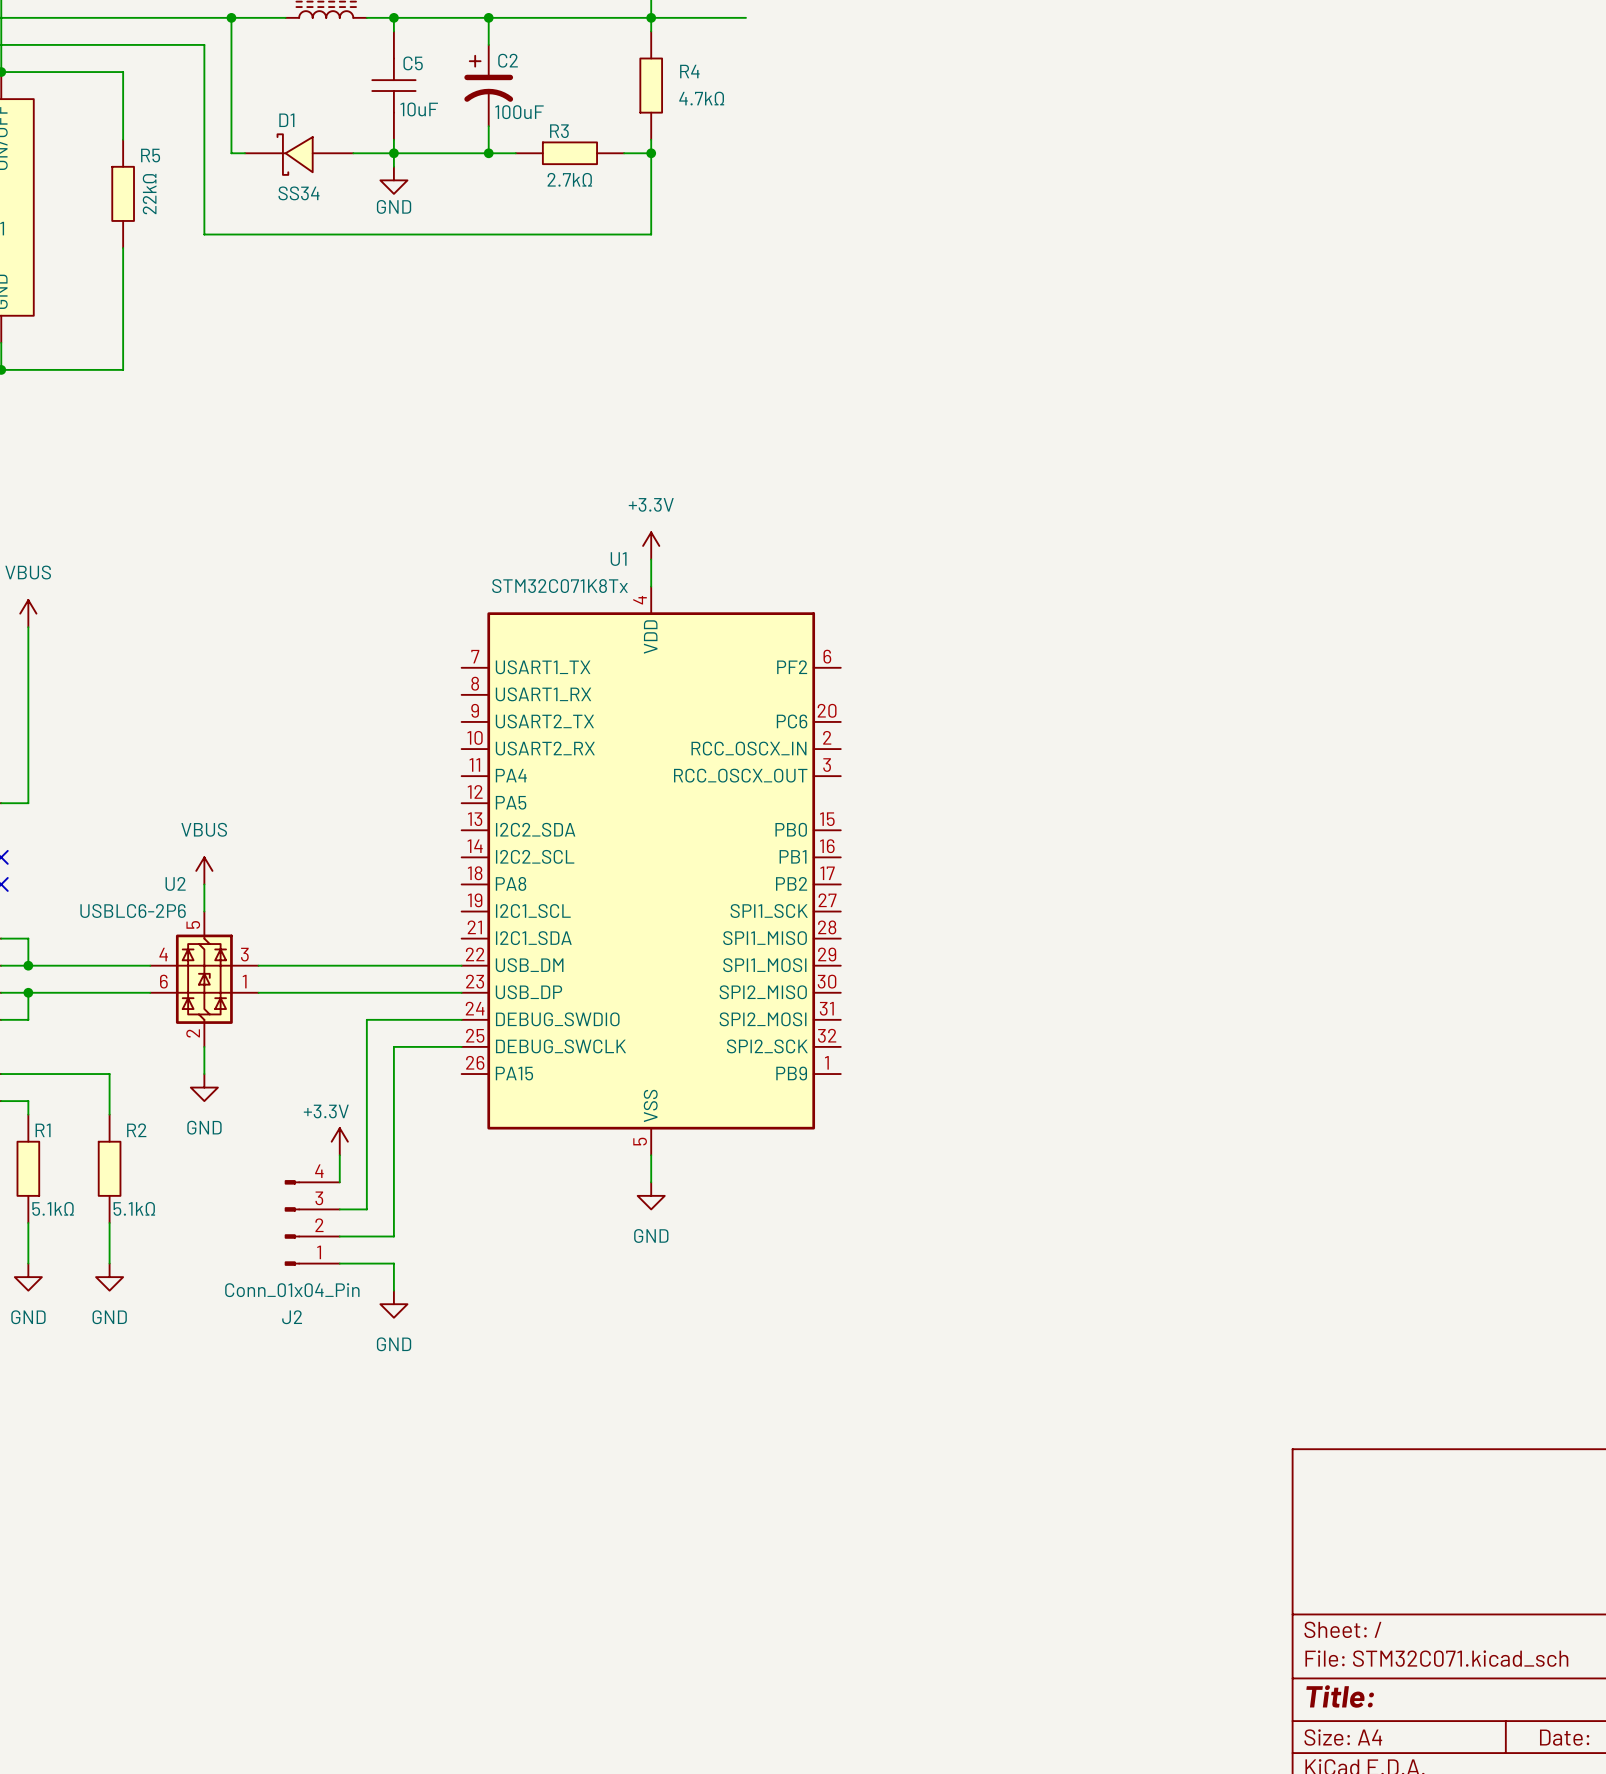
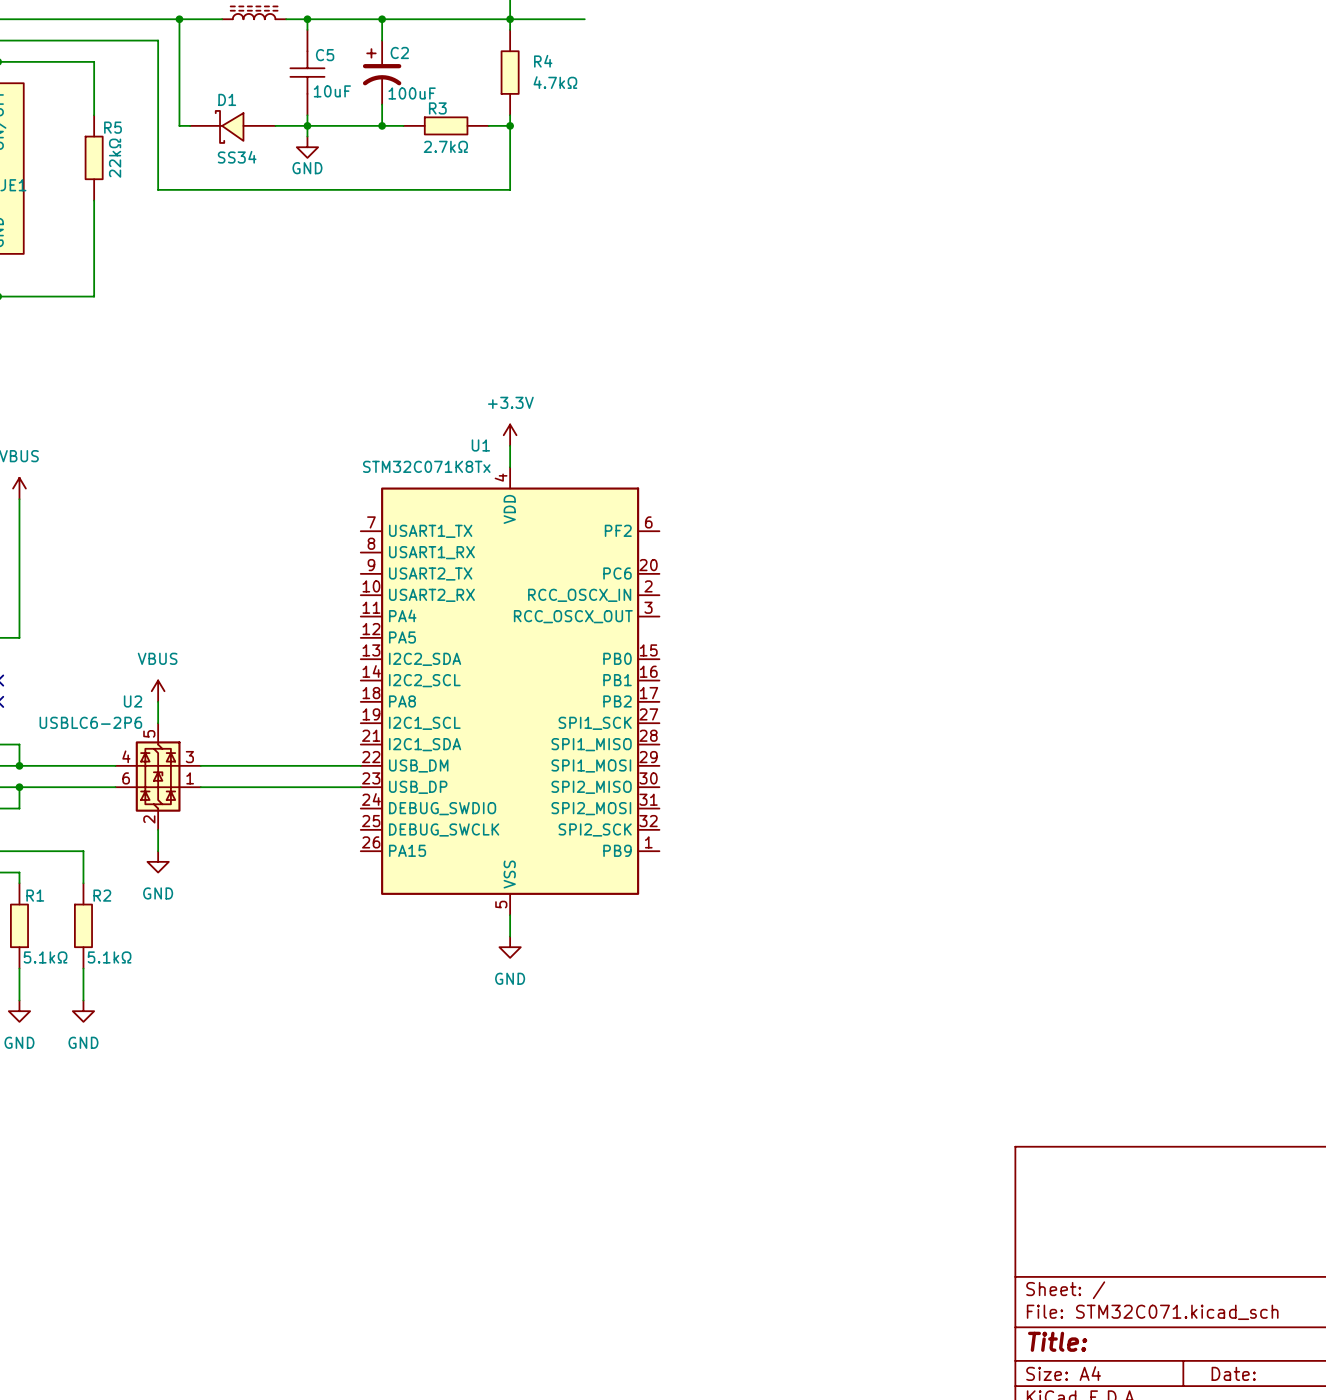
wire: (461, 1019) (366, 1019) (366, 1209) (339, 1209) -> none
wire: (461, 1046) (393, 1046) (393, 1236) (339, 1236) -> none
power symbol: +3.3V (339, 1141) -> none
wire: (339, 1155) (339, 1182) -> none
J2: Conn_01x04_Pin (312, 1222) -> none
wire: (339, 1263) (393, 1263) (393, 1290) -> none
power symbol: GND (393, 1304) -> none

